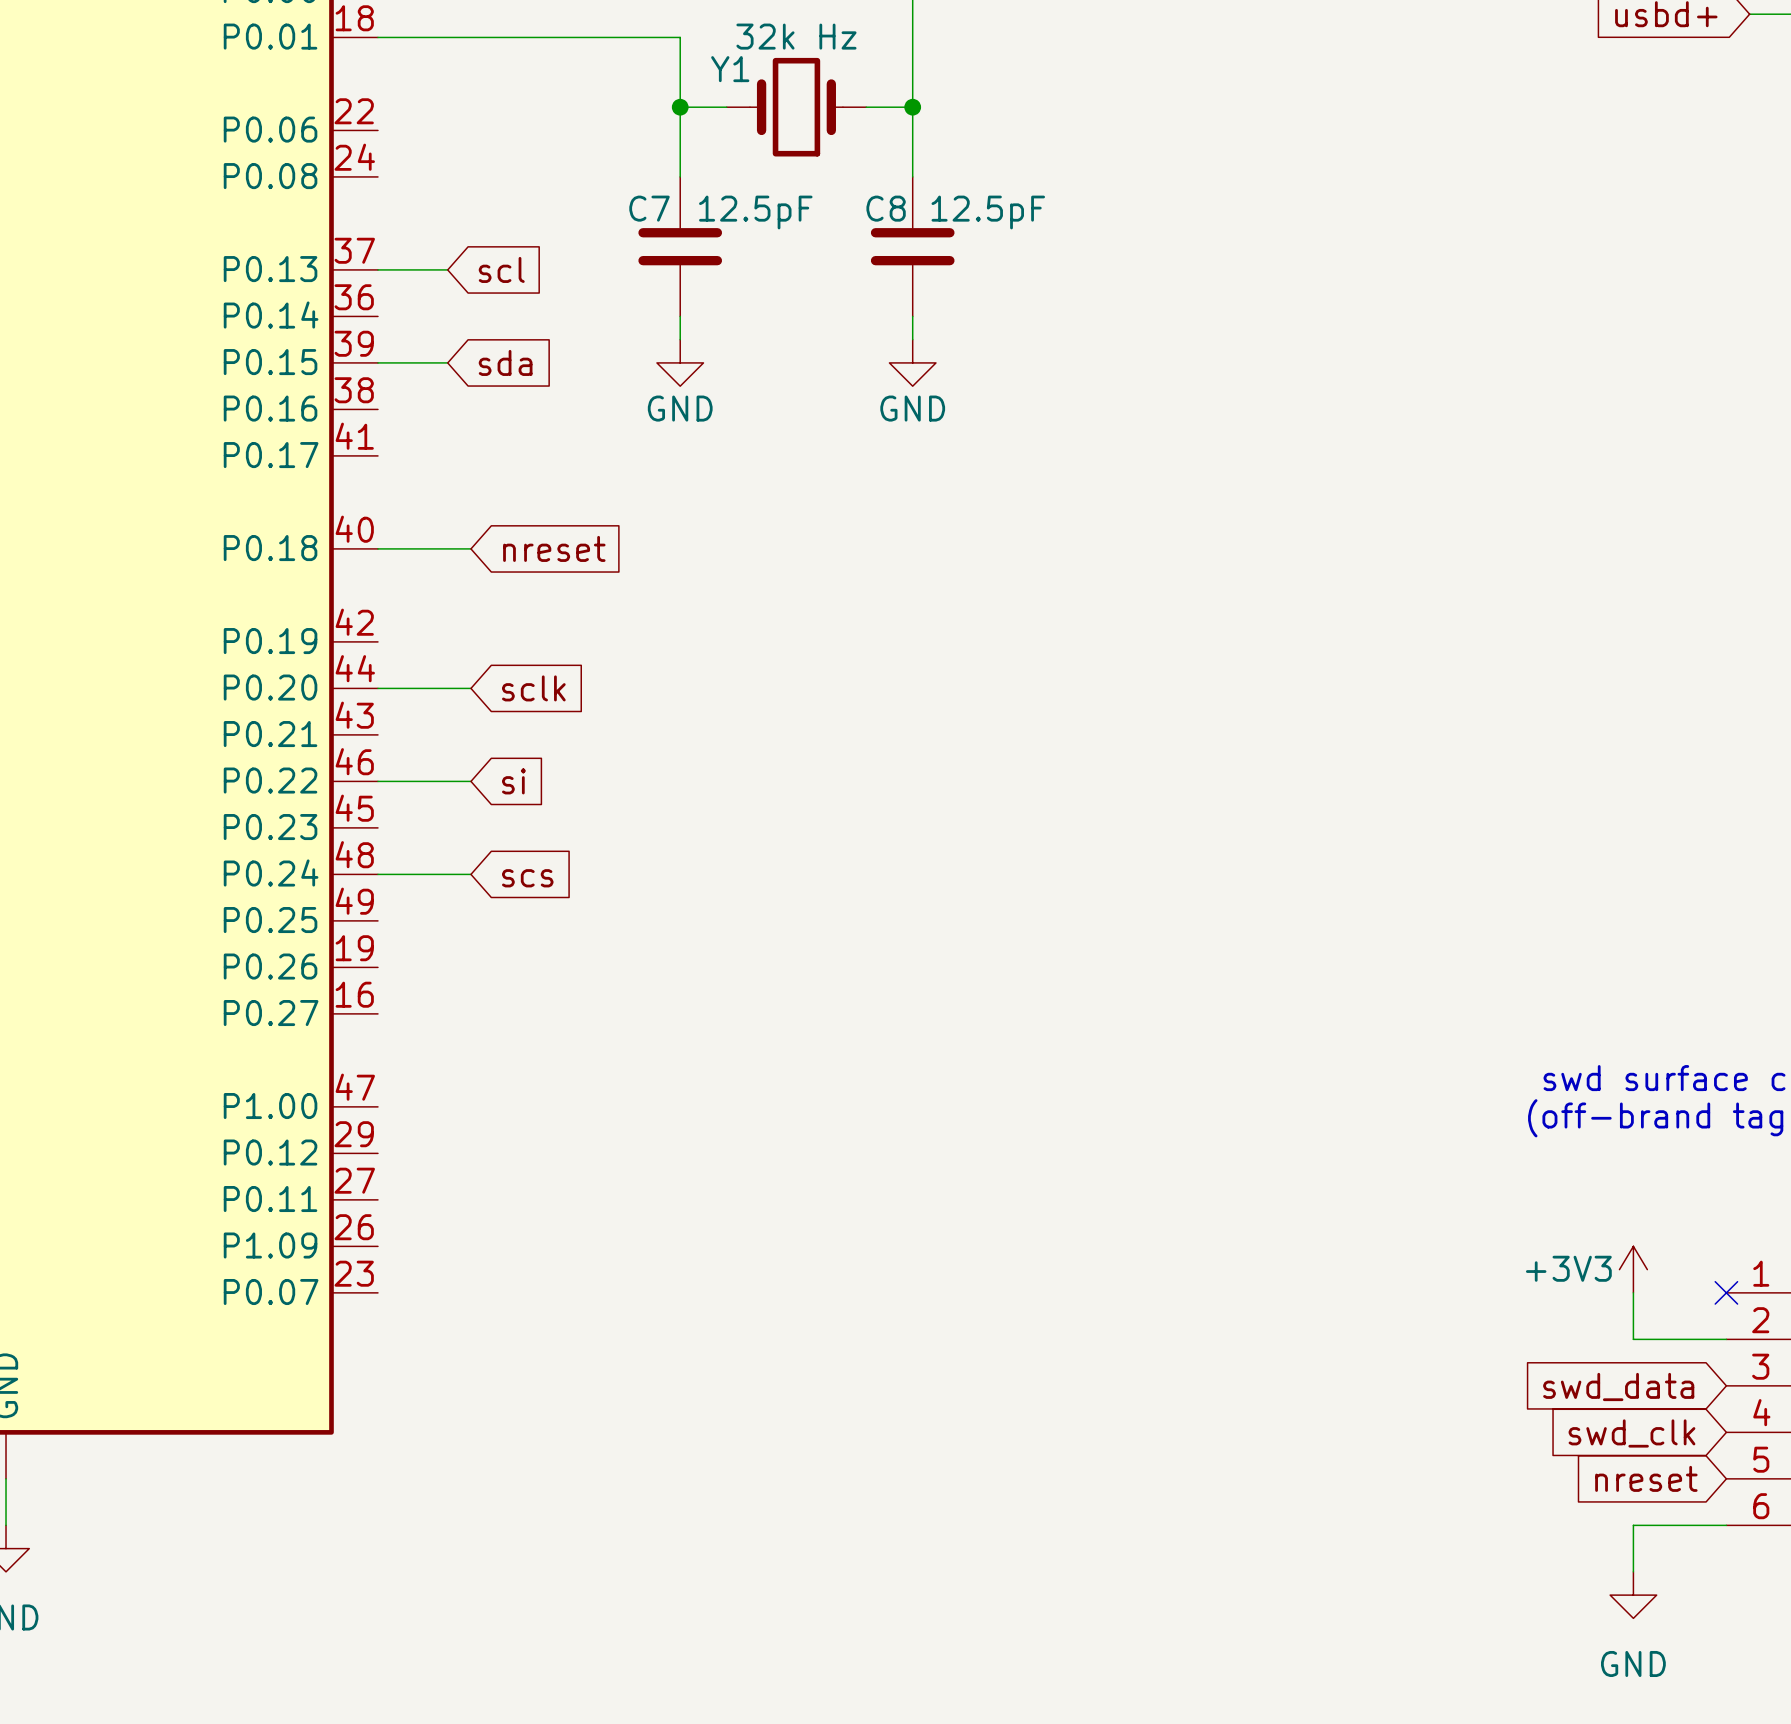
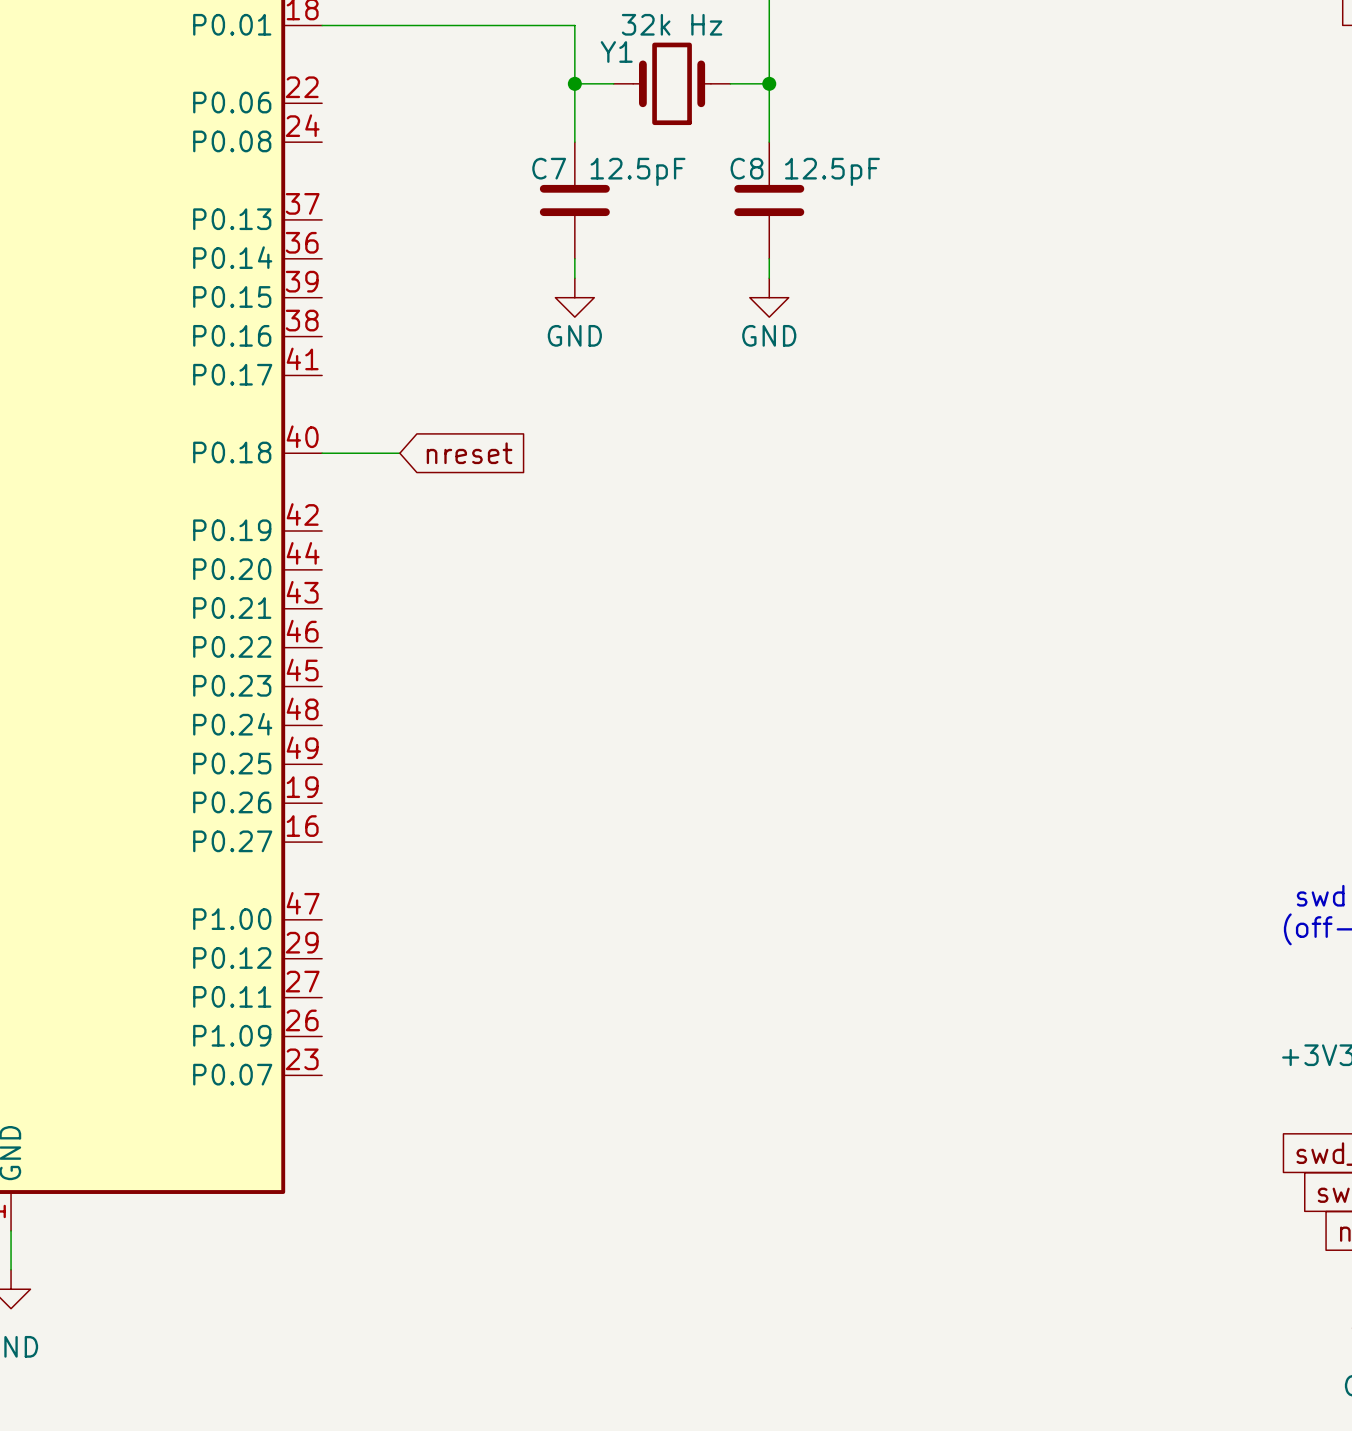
wire: (377, 269) (447, 269) -> none
global label: scl (501, 269) -> none
wire: (377, 362) (447, 362) -> none
global label: sda (505, 362) -> none
wire: (377, 688) (470, 688) -> none
global label: sclk (533, 688) -> none
wire: (377, 781) (470, 781) -> none
global label: si (513, 781) -> none
wire: (377, 874) (470, 874) -> none
global label: scs (527, 878) -> none

